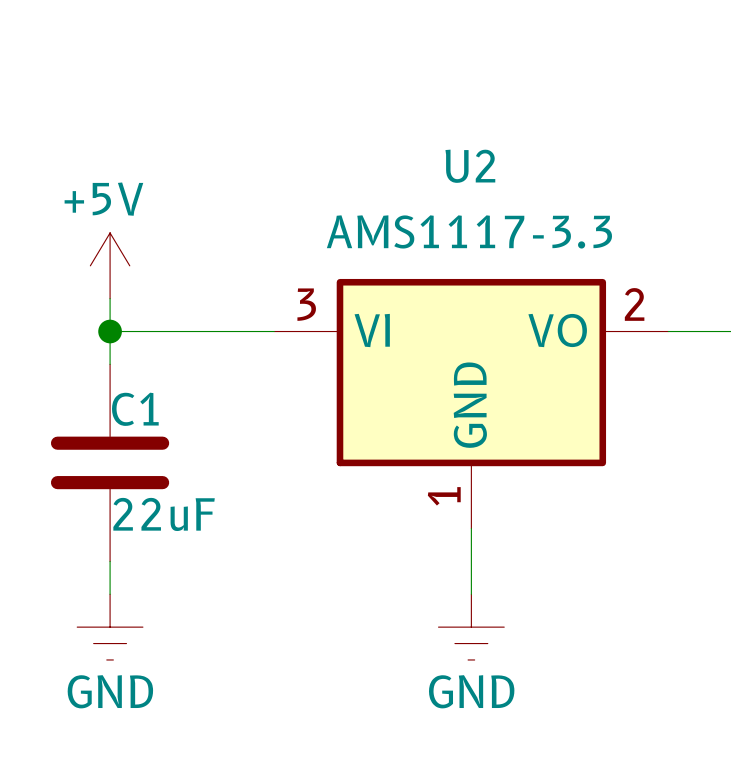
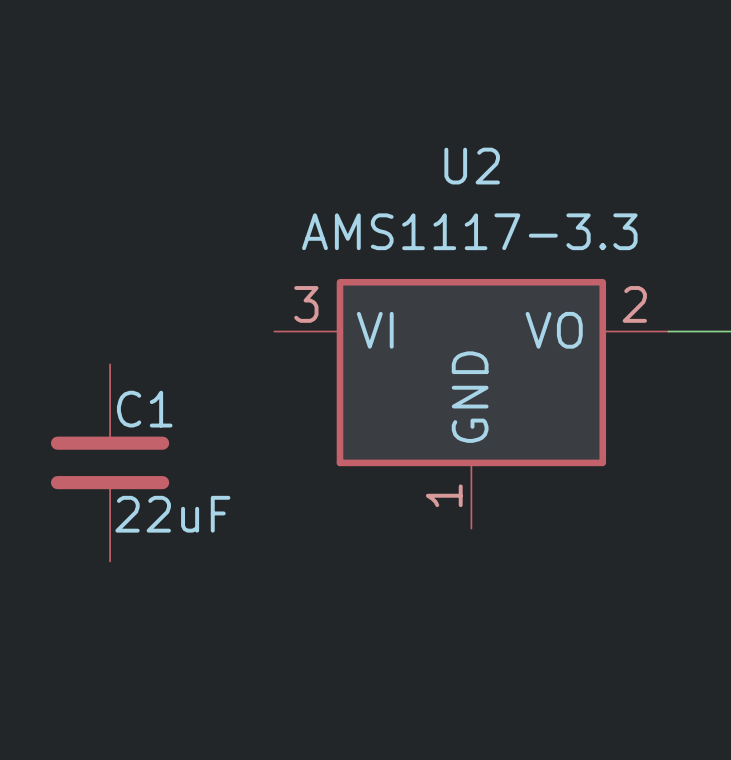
power symbol: +5V (110, 265) -> none
wire: (110, 298) (110, 364) -> none
wire: (110, 331) (274, 331) -> none
junction: (110, 331) -> none
wire: (471, 528) (471, 594) -> none
wire: (110, 561) (110, 594) -> none
power symbol: GND (110, 627) -> none
power symbol: GND (471, 627) -> none

